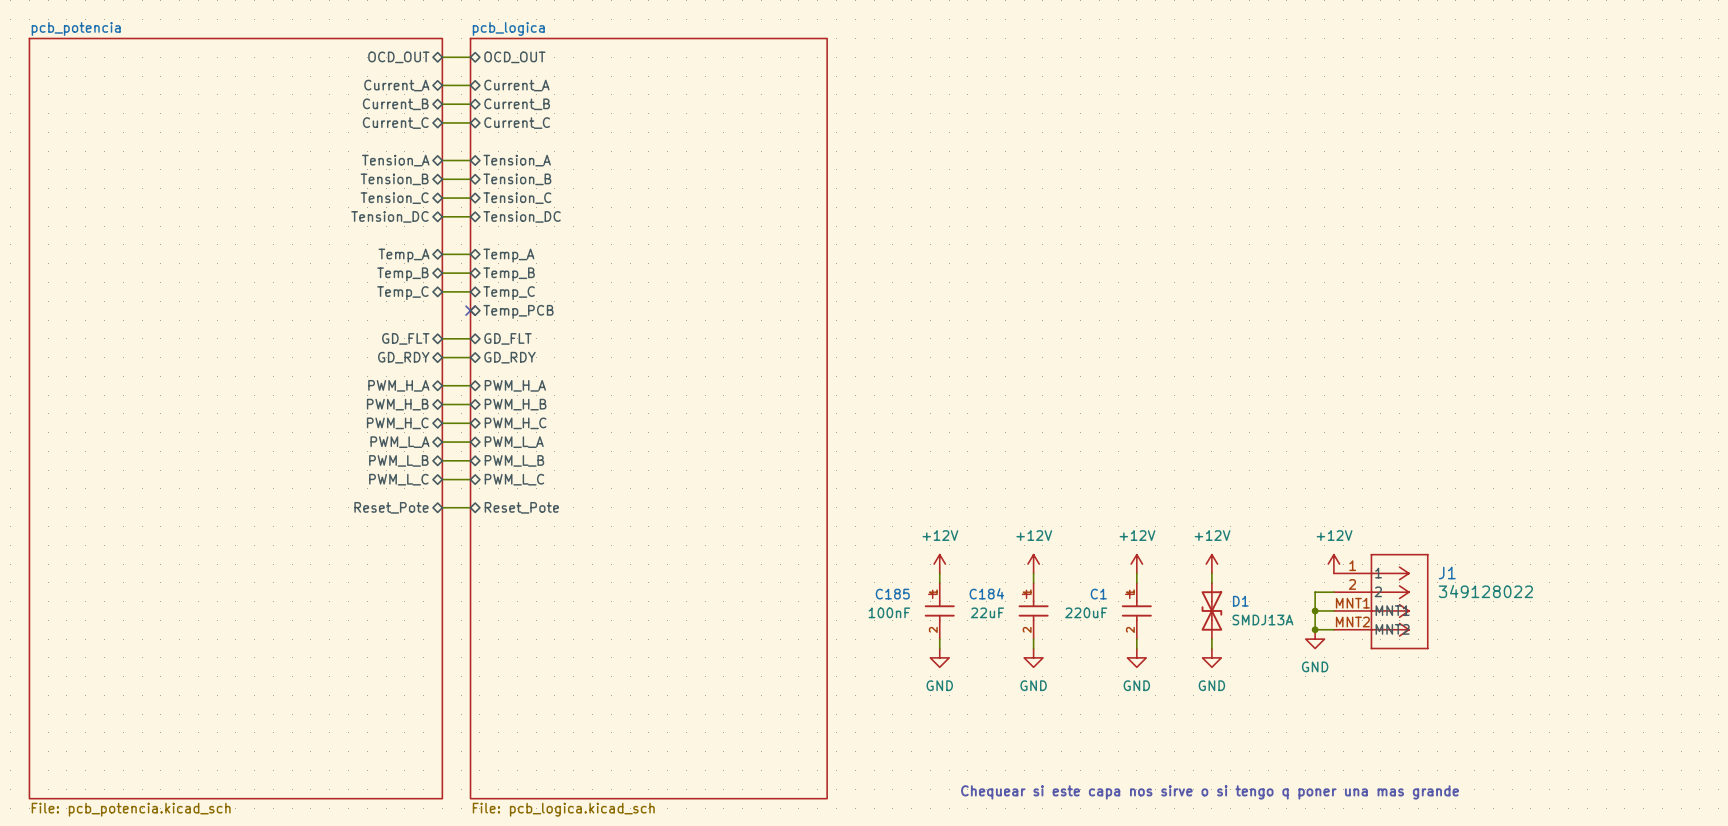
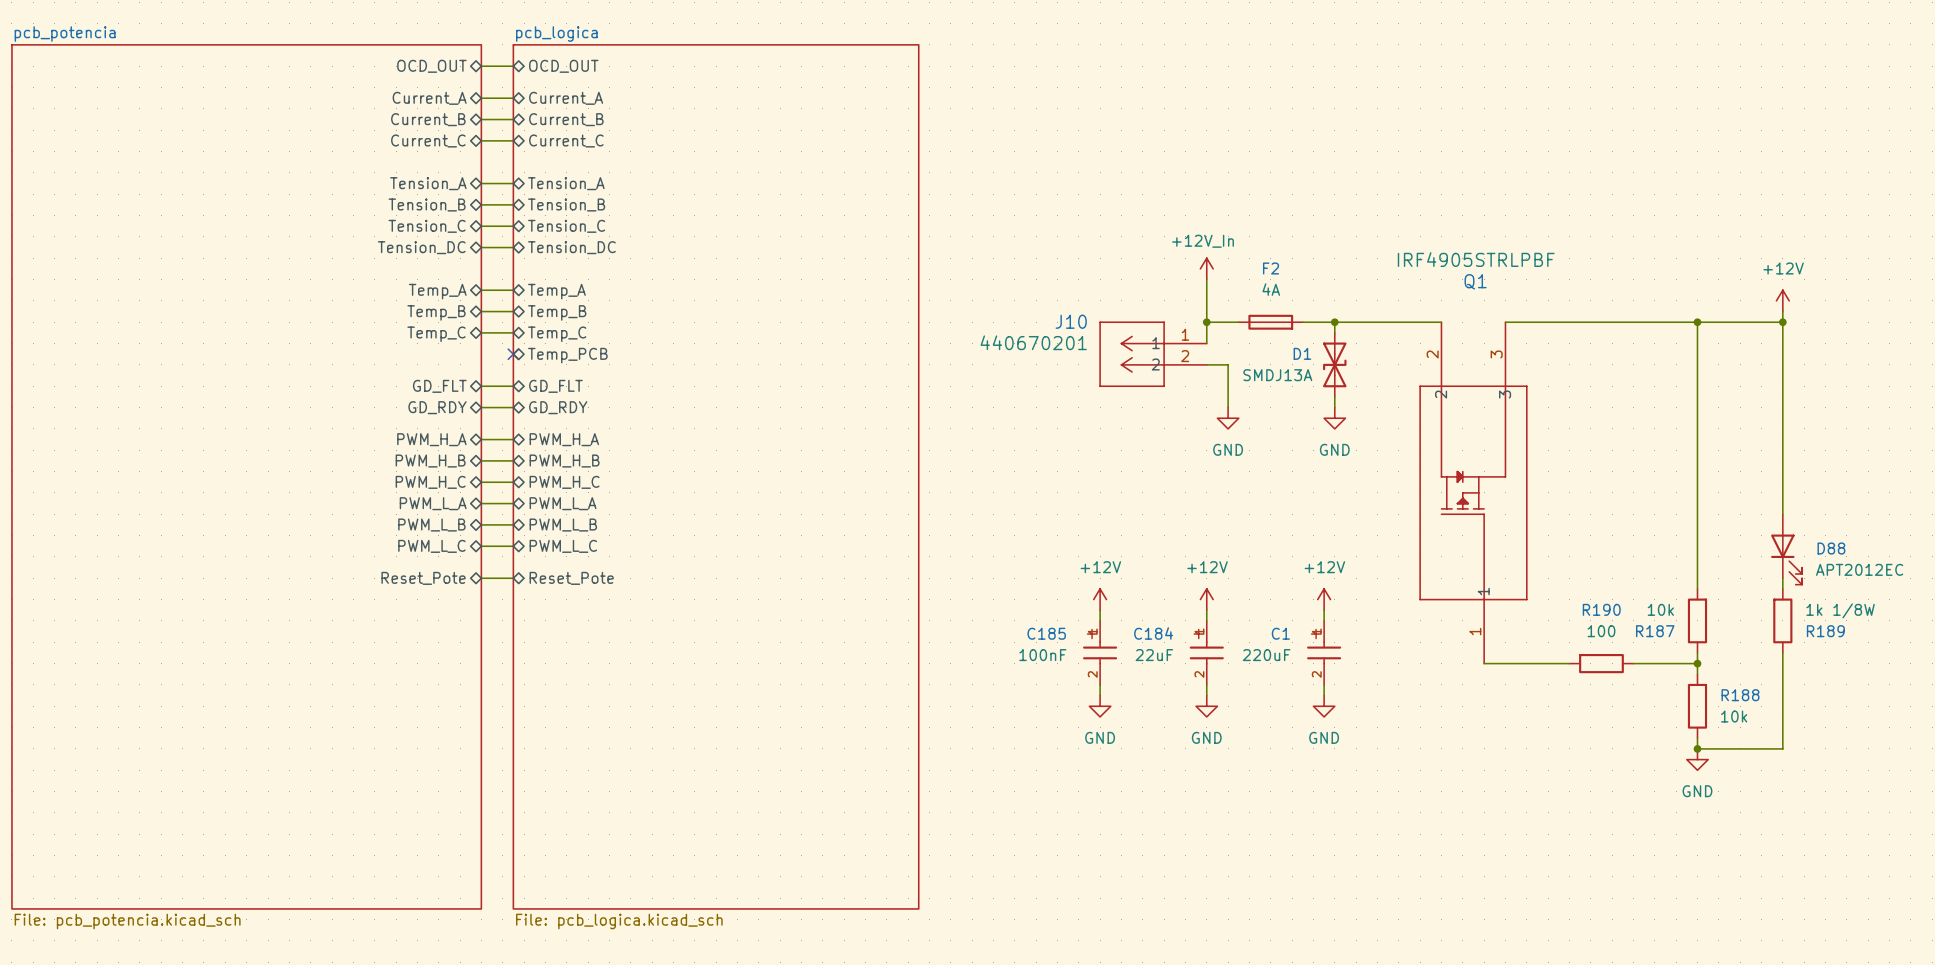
power symbol: none -> +12V_In (1206, 268)
wire: none -> (1206, 279) (1206, 343)
power symbol: none -> +12V (1782, 300)
wire: none -> (1782, 311) (1782, 514)
wire: none -> (1206, 322) (1238, 322)
junction: none -> (1206, 322)
F2: none -> 4A (1270, 322)
wire: none -> (1302, 322) (1441, 322)
wire: none -> (1334, 322) (1334, 332)
junction: none -> (1334, 322)
wire: none -> (1505, 322) (1782, 322)
wire: none -> (1697, 322) (1697, 588)
junction: none -> (1697, 322)
junction: none -> (1782, 322)
J10: none -> 440670201 (1153, 354)
wire: none -> (1206, 364) (1228, 364) (1228, 407)
wire: none -> (1334, 396) (1334, 407)
power symbol: none -> GND (1228, 418)
power symbol: none -> GND (1334, 418)
Q1: none -> IRF4905STRLPBF (1473, 492)
D88: none -> APT2012EC (1786, 549)
wire: none -> (1782, 578) (1782, 588)
power symbol: none -> +12V (1100, 599)
power symbol: none -> +12V (1206, 599)
power symbol: none -> +12V (1324, 599)
R187: none -> 10k (1697, 620)
R189: none -> 1k 1/8W (1782, 620)
power symbol: +12V (939, 564) -> none
power symbol: +12V (1033, 564) -> none
power symbol: +12V (1136, 564) -> none
power symbol: +12V (1211, 564) -> none
power symbol: +12V (1333, 564) -> none
wire: (939, 573) (939, 582) -> (1100, 610) (1100, 620)
wire: (1033, 573) (1033, 582) -> (1206, 610) (1206, 620)
wire: (1136, 573) (1136, 582) -> (1324, 610) (1324, 620)
wire: (1211, 573) (1211, 582) -> none
wire: none -> (1697, 652) (1697, 674)
wire: none -> (1782, 652) (1782, 748) (1697, 748) (1697, 738)
wire: none -> (1484, 663) (1569, 663)
R190: none -> 100 (1601, 663)
wire: none -> (1633, 663) (1697, 663)
junction: none -> (1697, 663)
wire: (1333, 592) (1315, 592) (1315, 629) (1333, 629) -> none
J1: 349128022 (1381, 601) -> none
C185 position: (939, 610) -> (1100, 652)
C184 position: (1033, 610) -> (1206, 652)
C1 position: (1136, 610) -> (1324, 652)
D1 flip: as is (1211, 610) -> left-right (1334, 364)
D1 position: (1211, 610) -> (1334, 364)
wire: (1315, 610) (1333, 610) -> none
junction: (1315, 610) -> none
power symbol: none -> GND (1100, 706)
power symbol: none -> GND (1206, 706)
power symbol: none -> GND (1324, 706)
R188: none -> 10k (1697, 706)
junction: (1315, 629) -> none
wire: (939, 639) (939, 648) -> (1100, 684) (1100, 695)
wire: (1033, 639) (1033, 648) -> (1206, 684) (1206, 695)
wire: (1136, 639) (1136, 648) -> (1324, 684) (1324, 695)
wire: (1211, 639) (1211, 648) -> none
power symbol: GND (1315, 639) -> none
power symbol: GND (939, 657) -> none
power symbol: GND (1033, 657) -> none
power symbol: GND (1136, 657) -> none
power symbol: GND (1211, 657) -> none
junction: none -> (1697, 748)
power symbol: none -> GND (1697, 759)
text: Chequear si este capa nos sirve o si tengo q poner una mas grande (1210, 792) -> none

